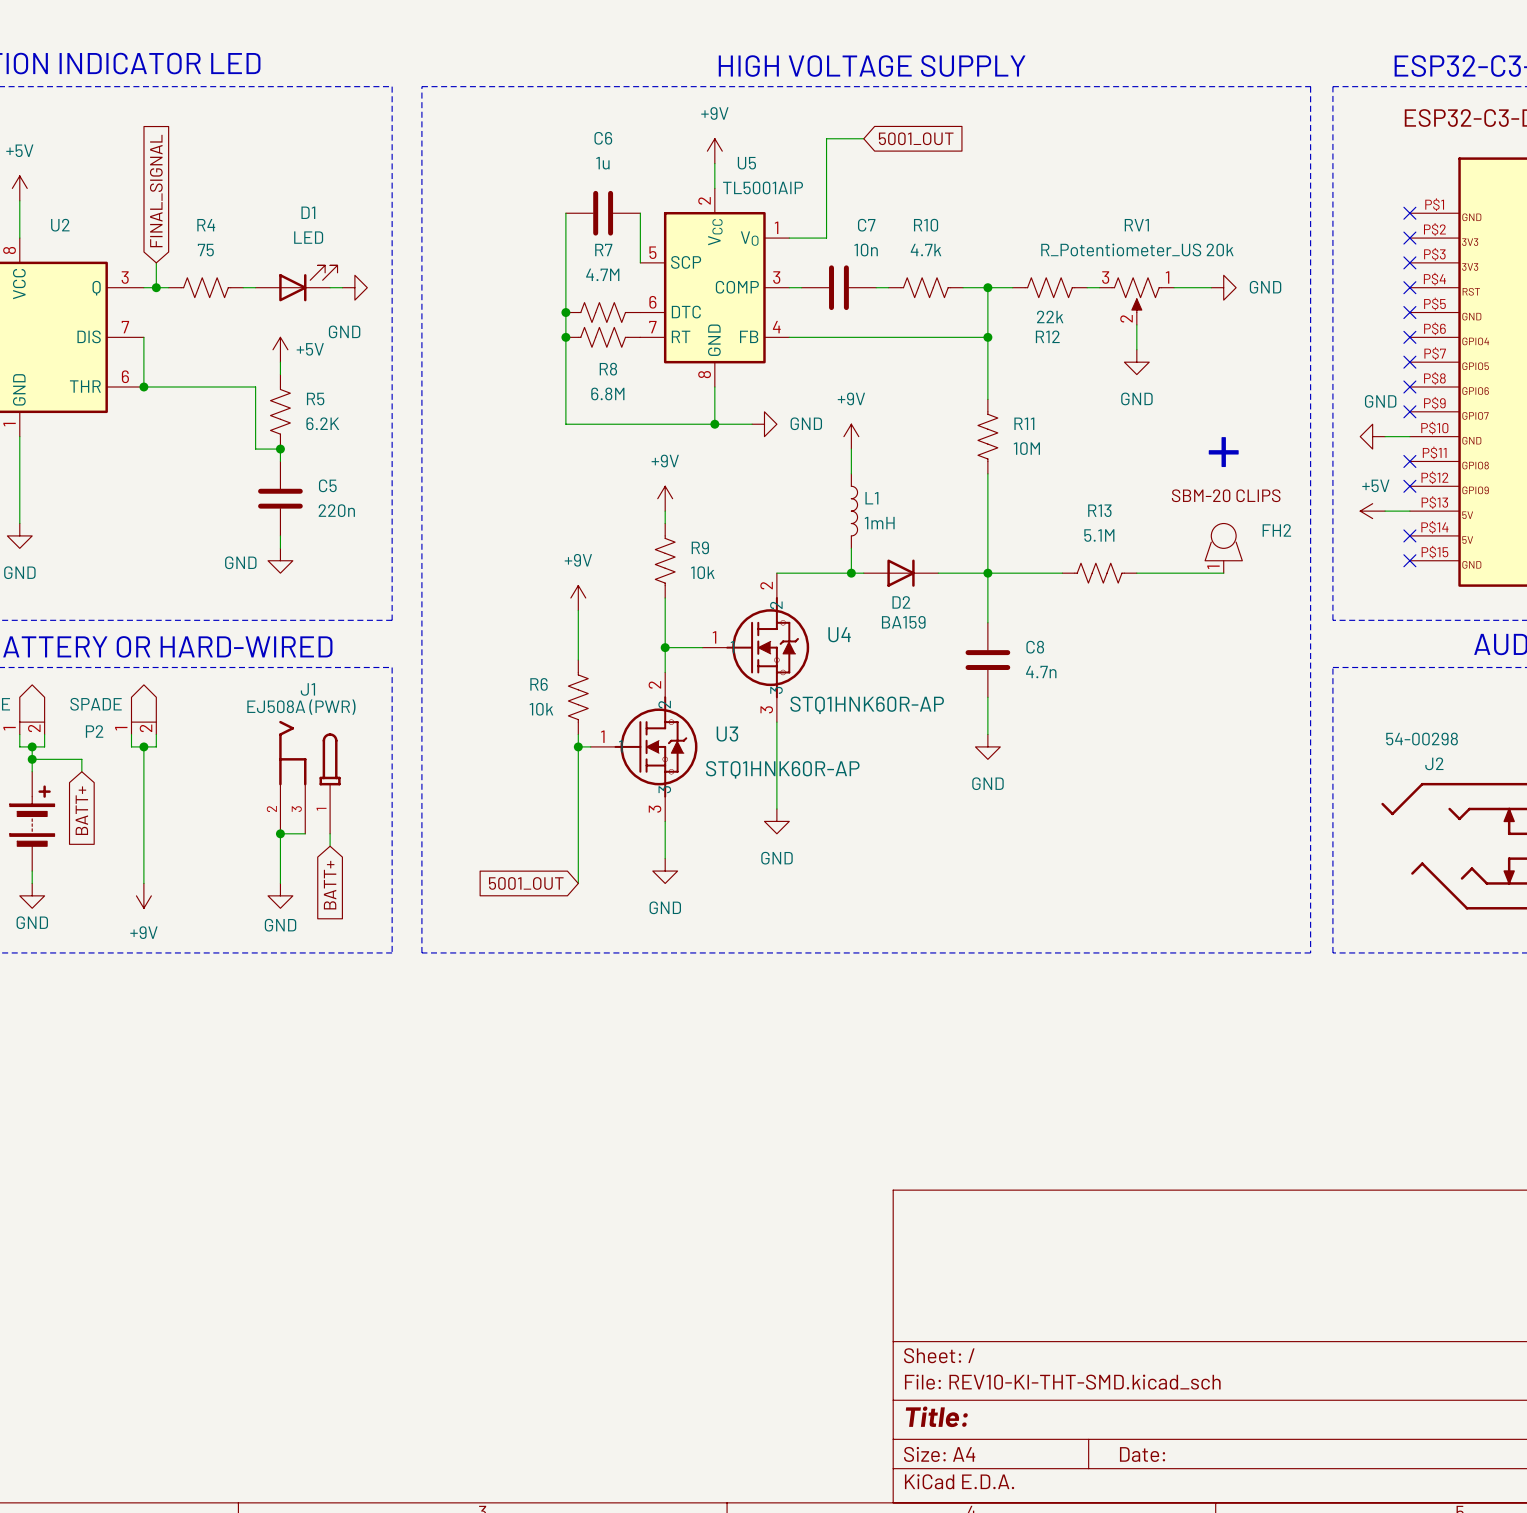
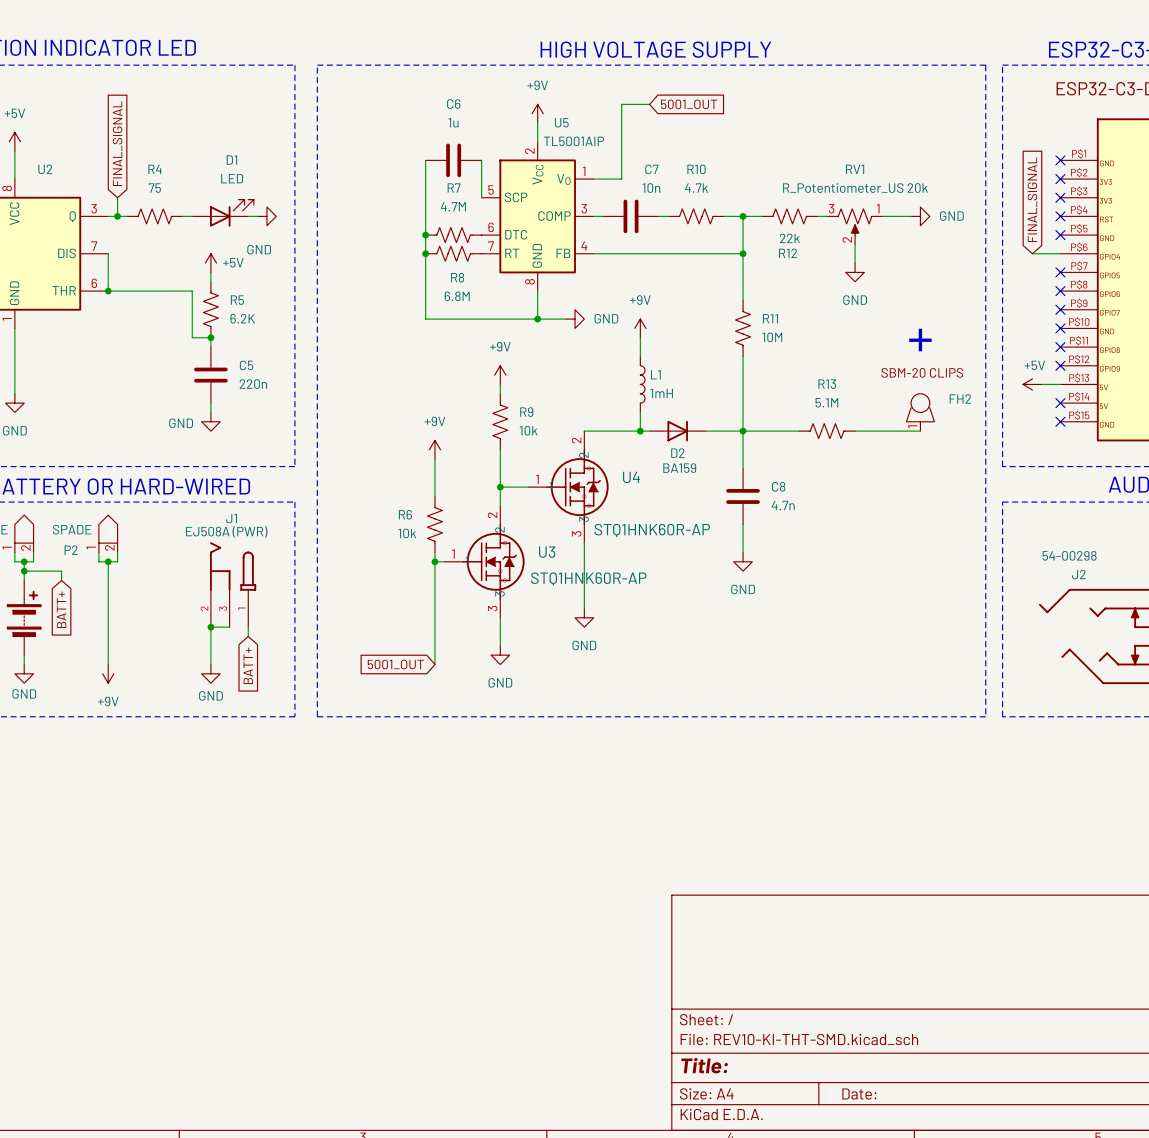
global label: none -> FINAL_SIGNAL (1032, 199)
wire: none -> (1032, 253) (1060, 253)
no-connect mark: (1409, 337) -> none
power symbol: GND (1372, 436) -> none
wire: (1385, 436) (1409, 436) -> none
no-connect mark: none -> (1060, 328)

